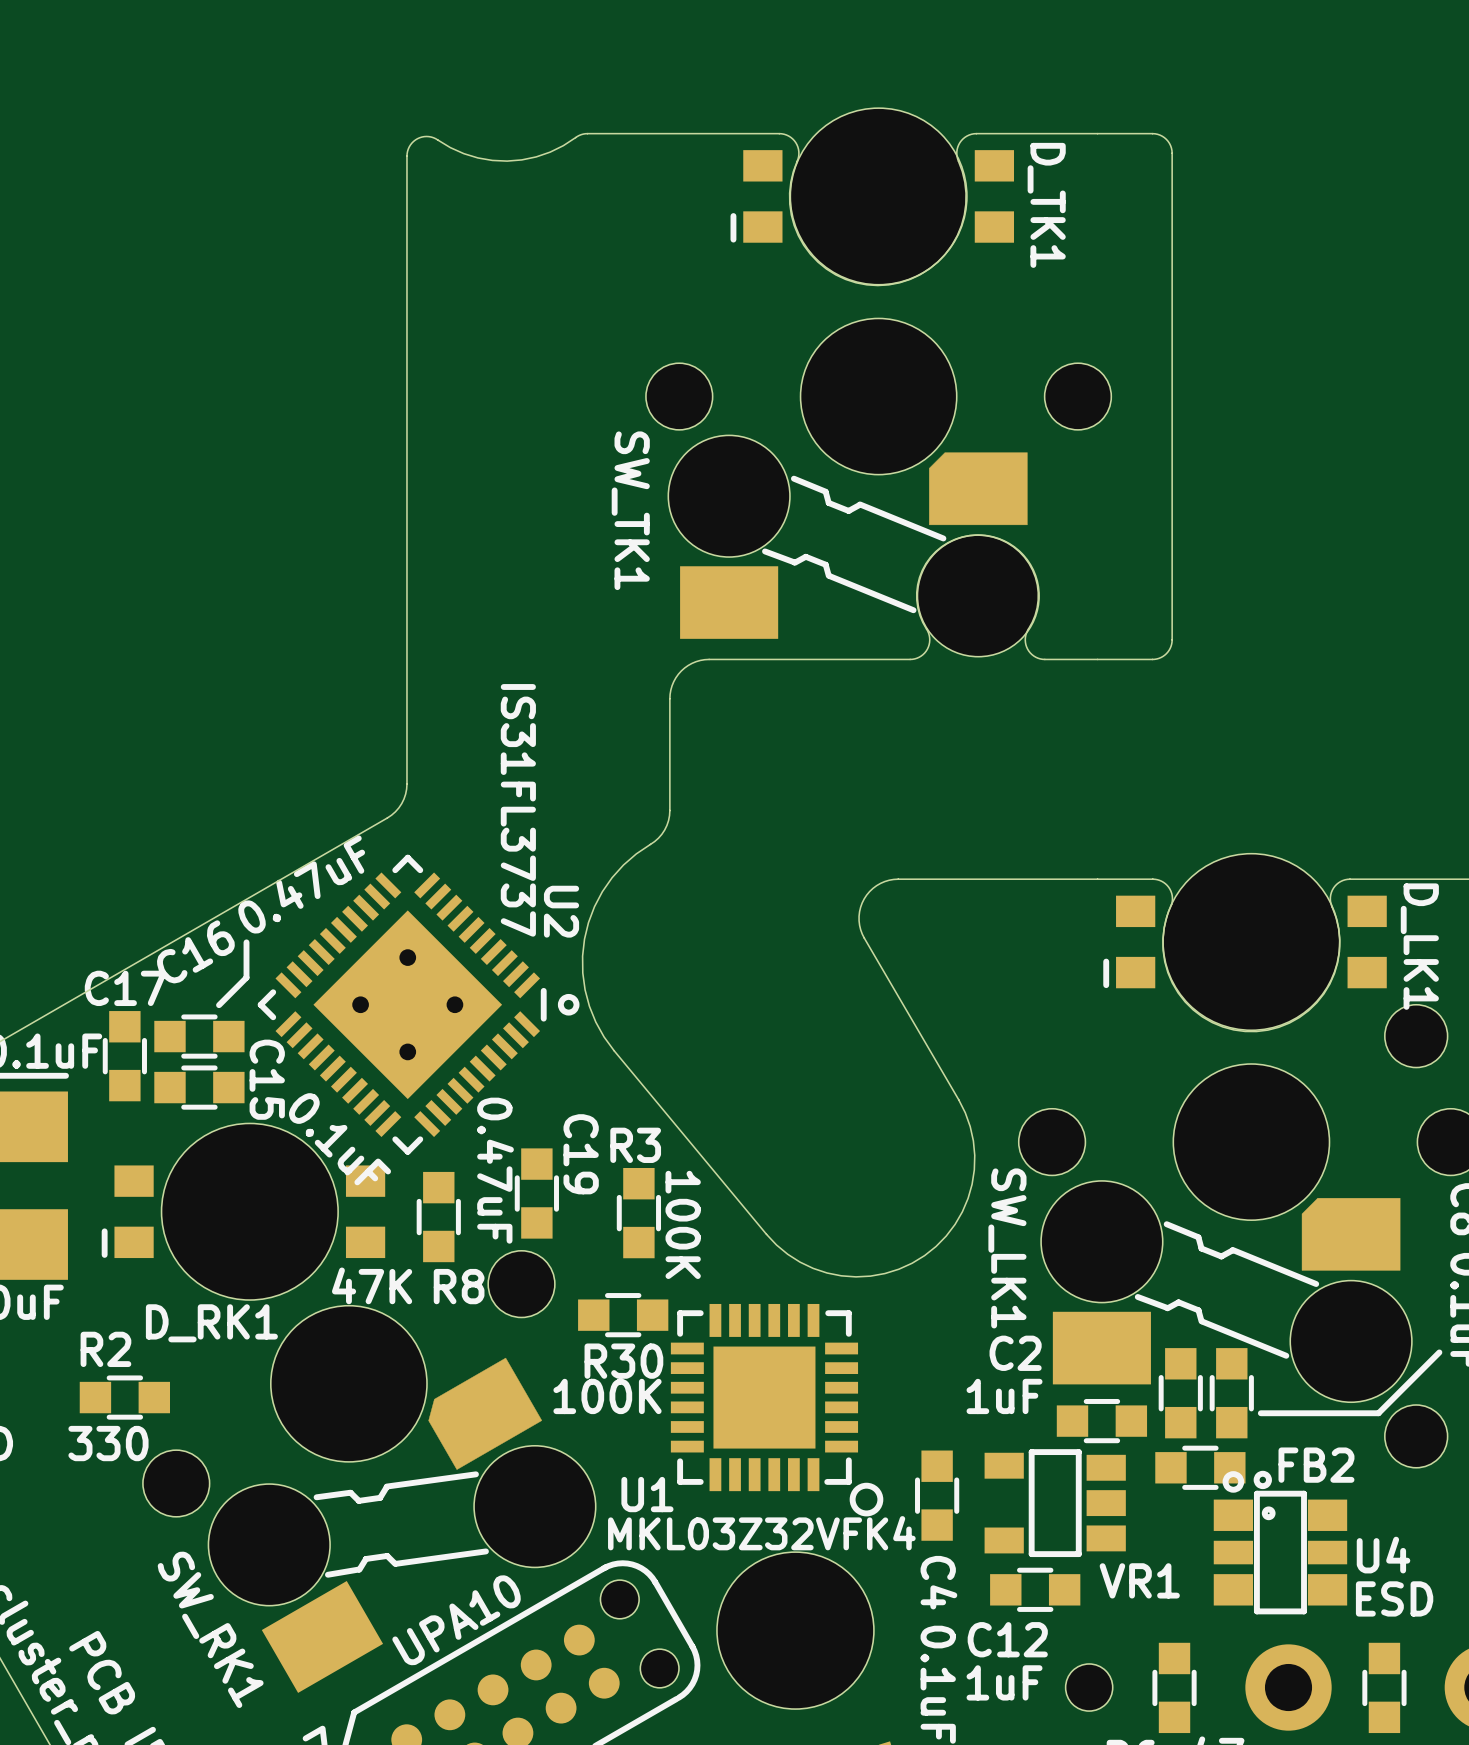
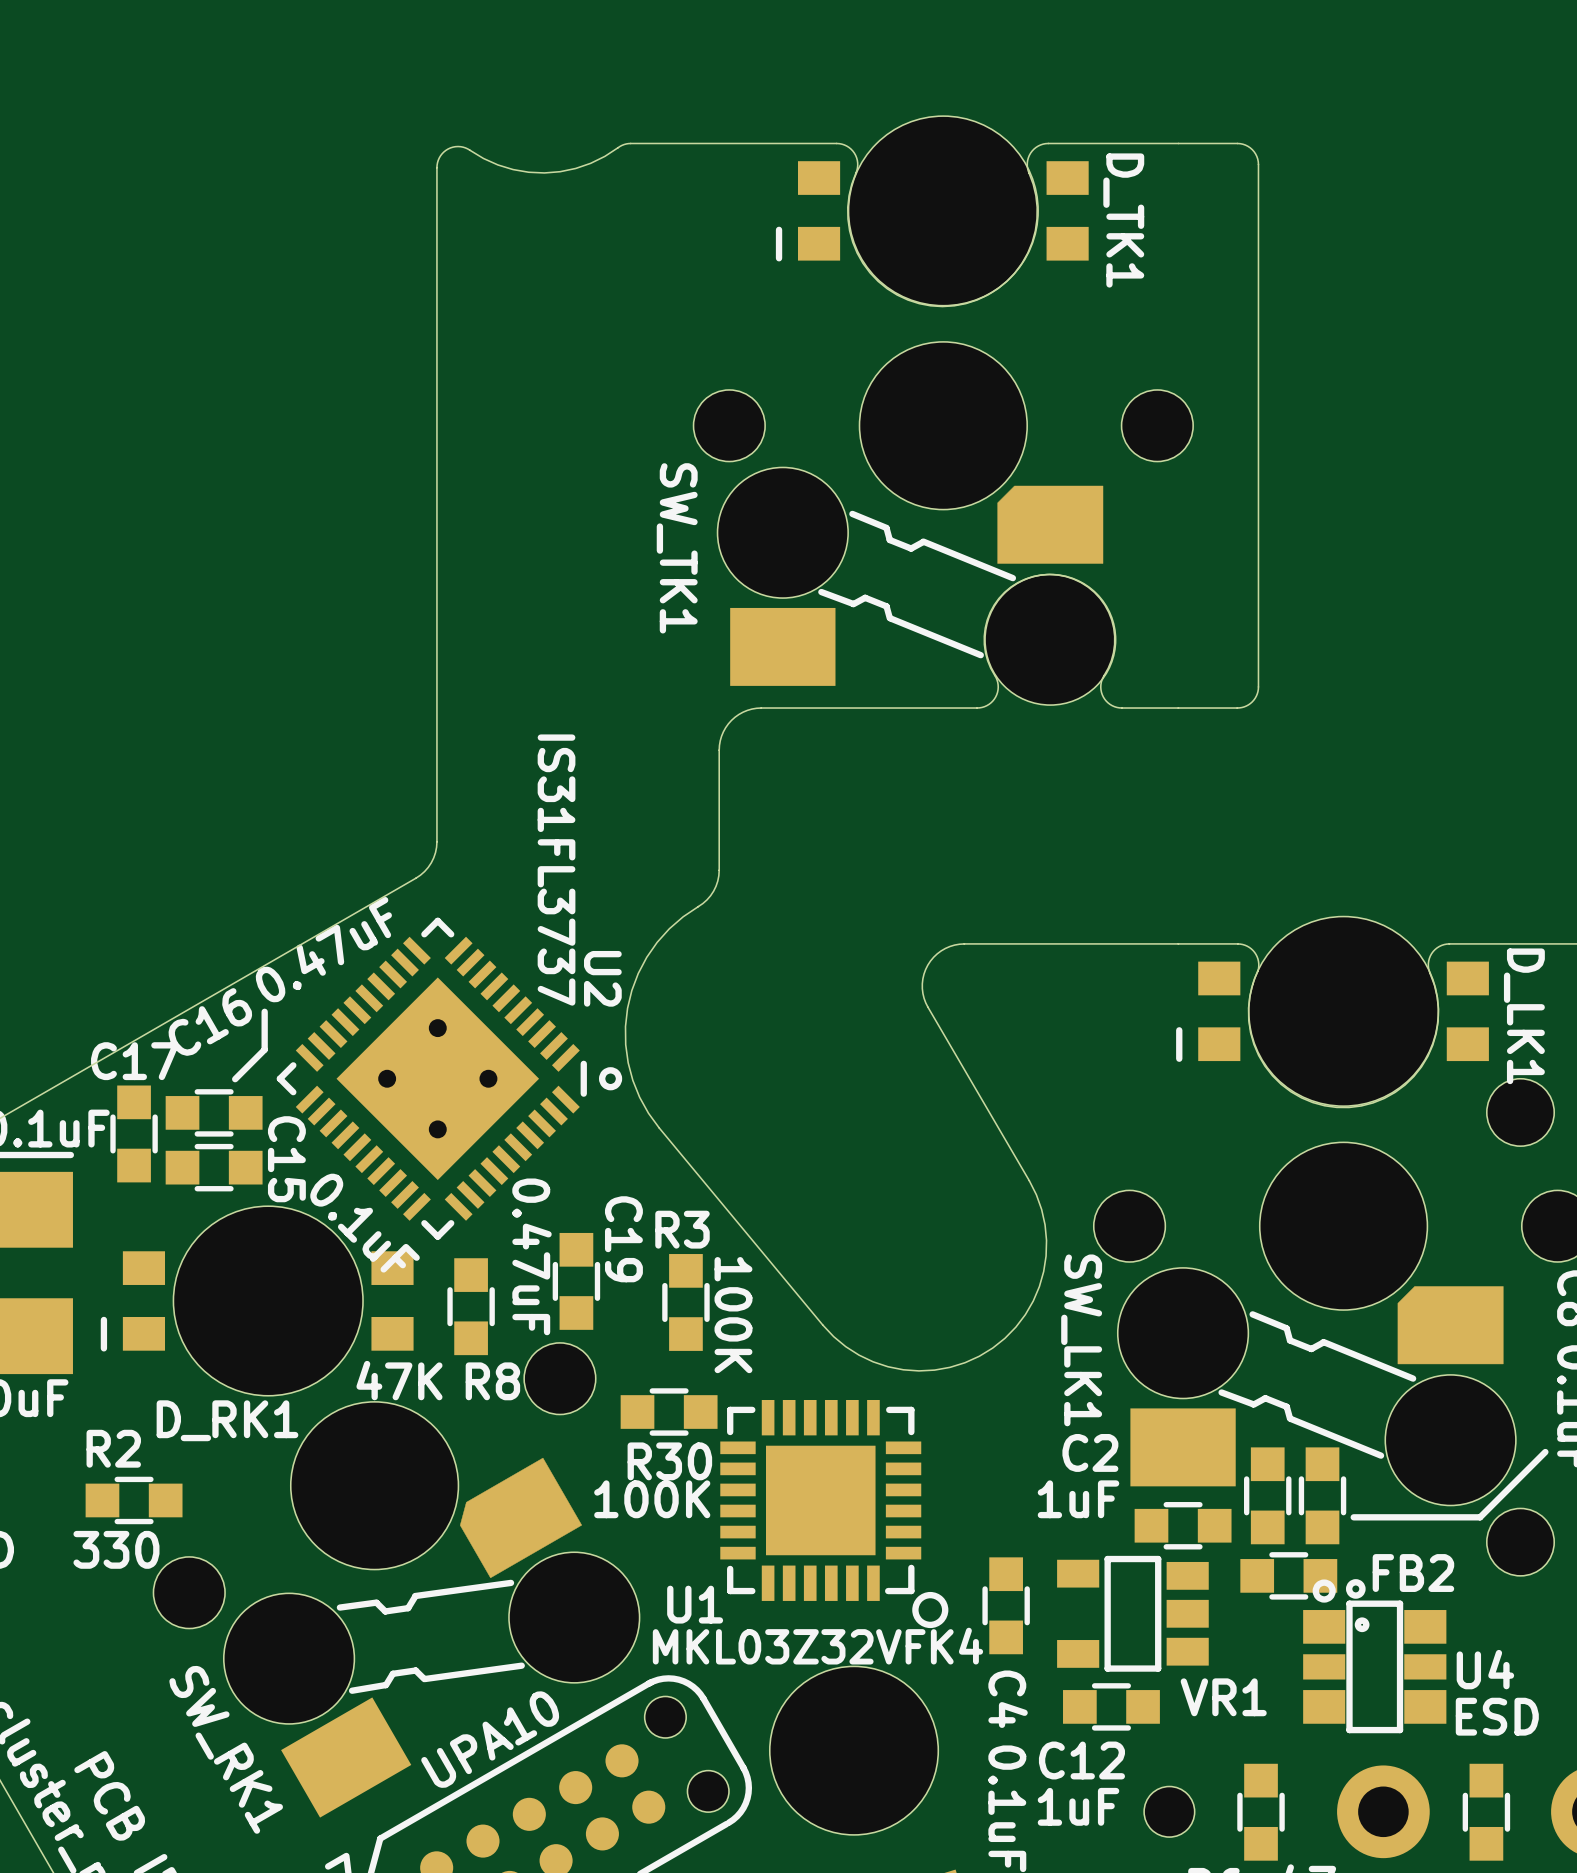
D_TK1 footprint: [730, 108, 1015, 285] -> [775, 116, 1089, 306]
D_LK1 footprint: [1103, 853, 1387, 1031] -> [1176, 916, 1489, 1107]
D_RK1 footprint: [101, 1123, 386, 1301] -> [100, 1206, 414, 1396]

